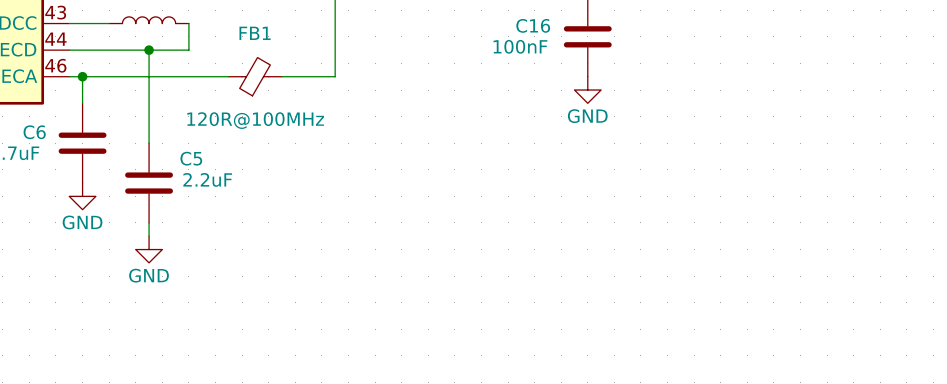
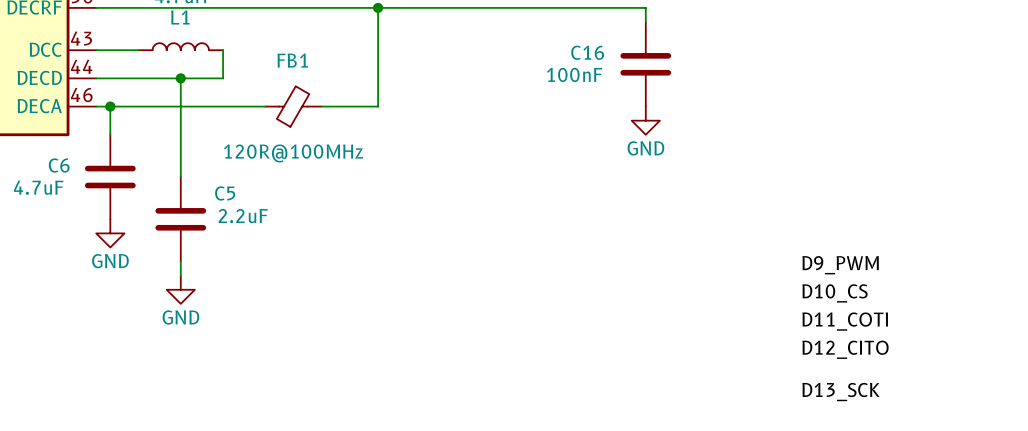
label: none -> D9_PWM (840, 265)
label: none -> D10_CS (835, 293)
label: none -> D11_COTI (845, 321)
label: none -> D12_CITO (845, 349)
label: none -> D13_SCK (840, 392)

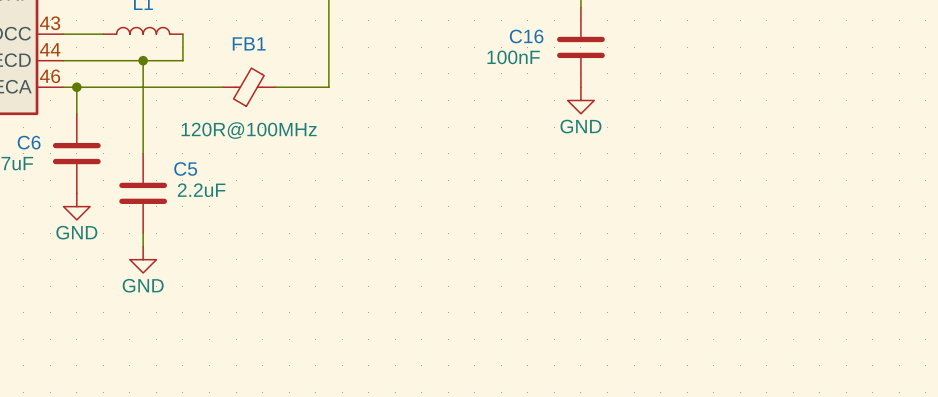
label: D9_PWM (840, 265) -> none
label: D10_CS (835, 293) -> none
label: D11_COTI (845, 321) -> none
label: D12_CITO (845, 349) -> none
label: D13_SCK (840, 392) -> none

